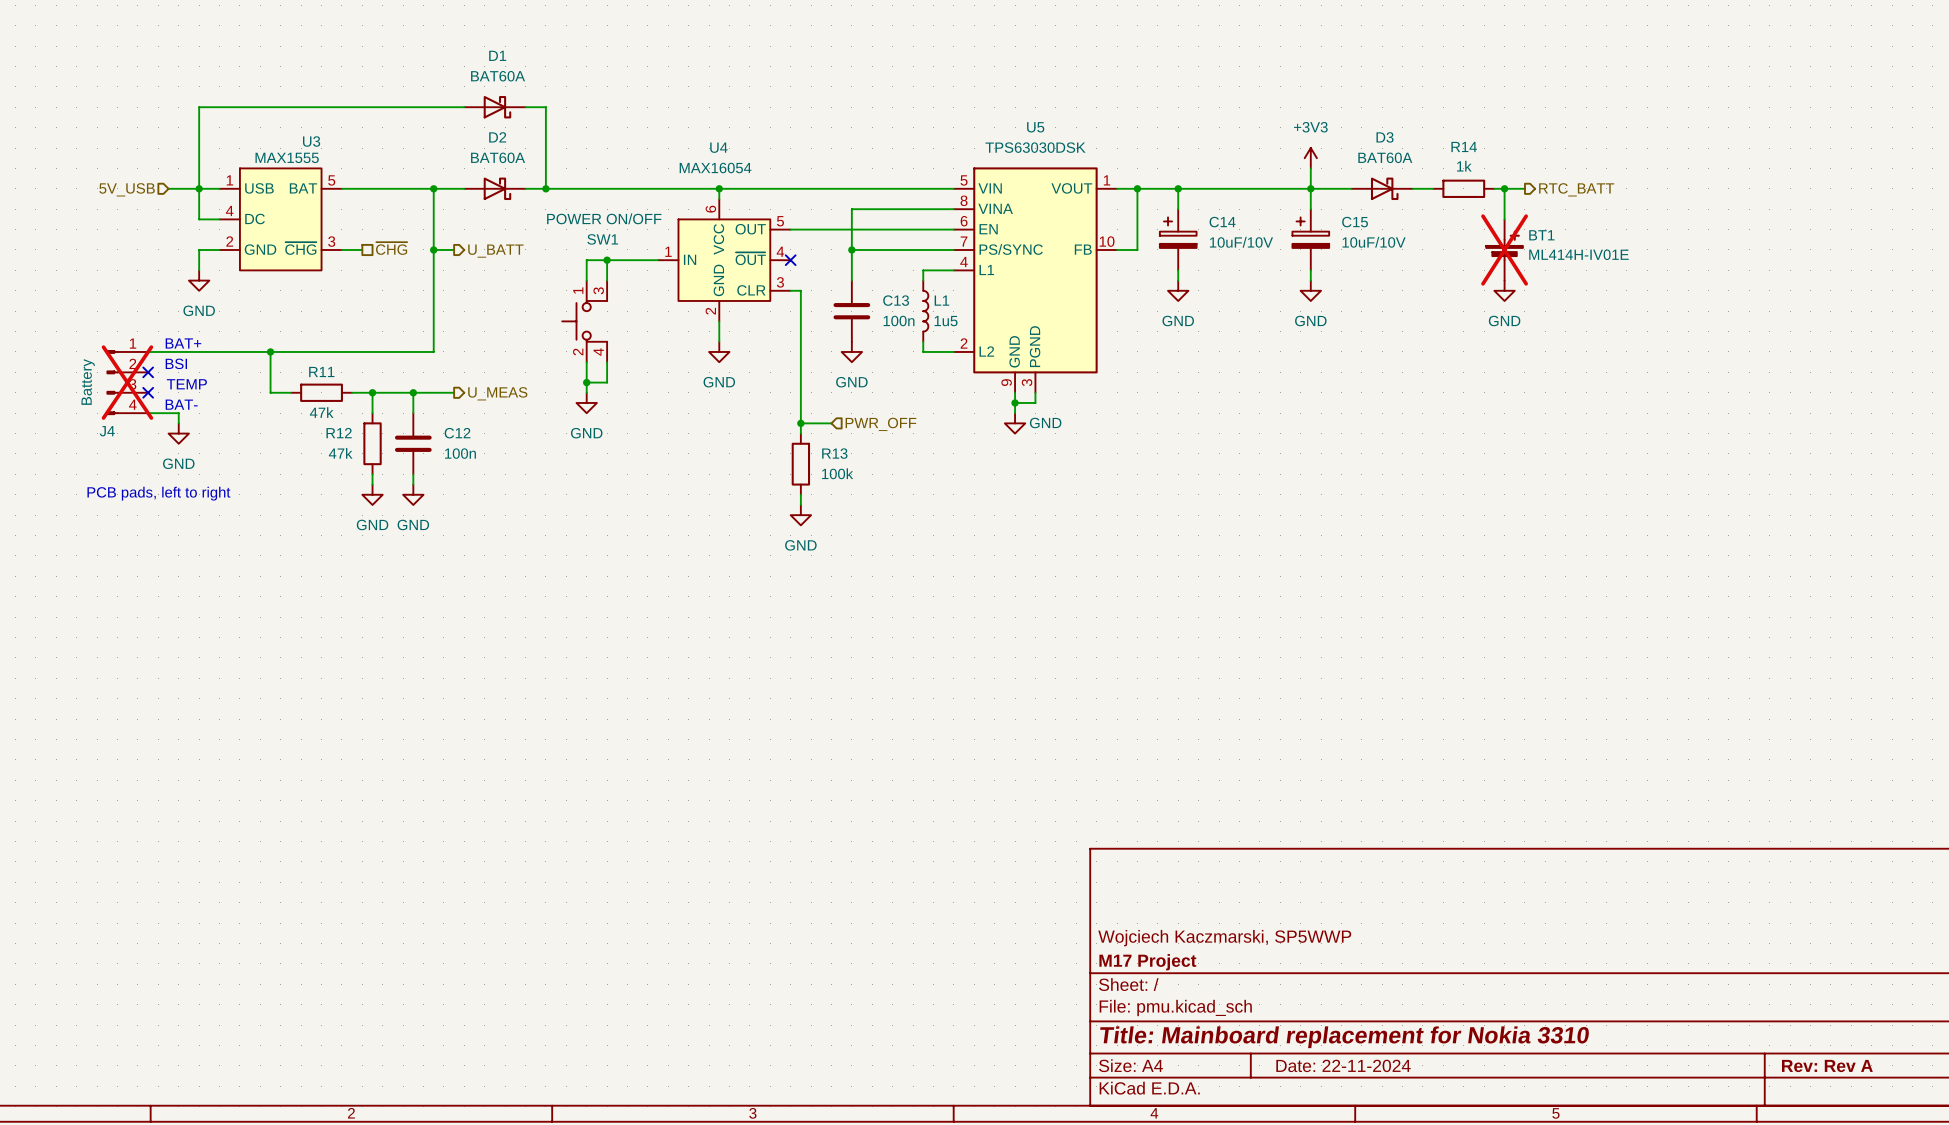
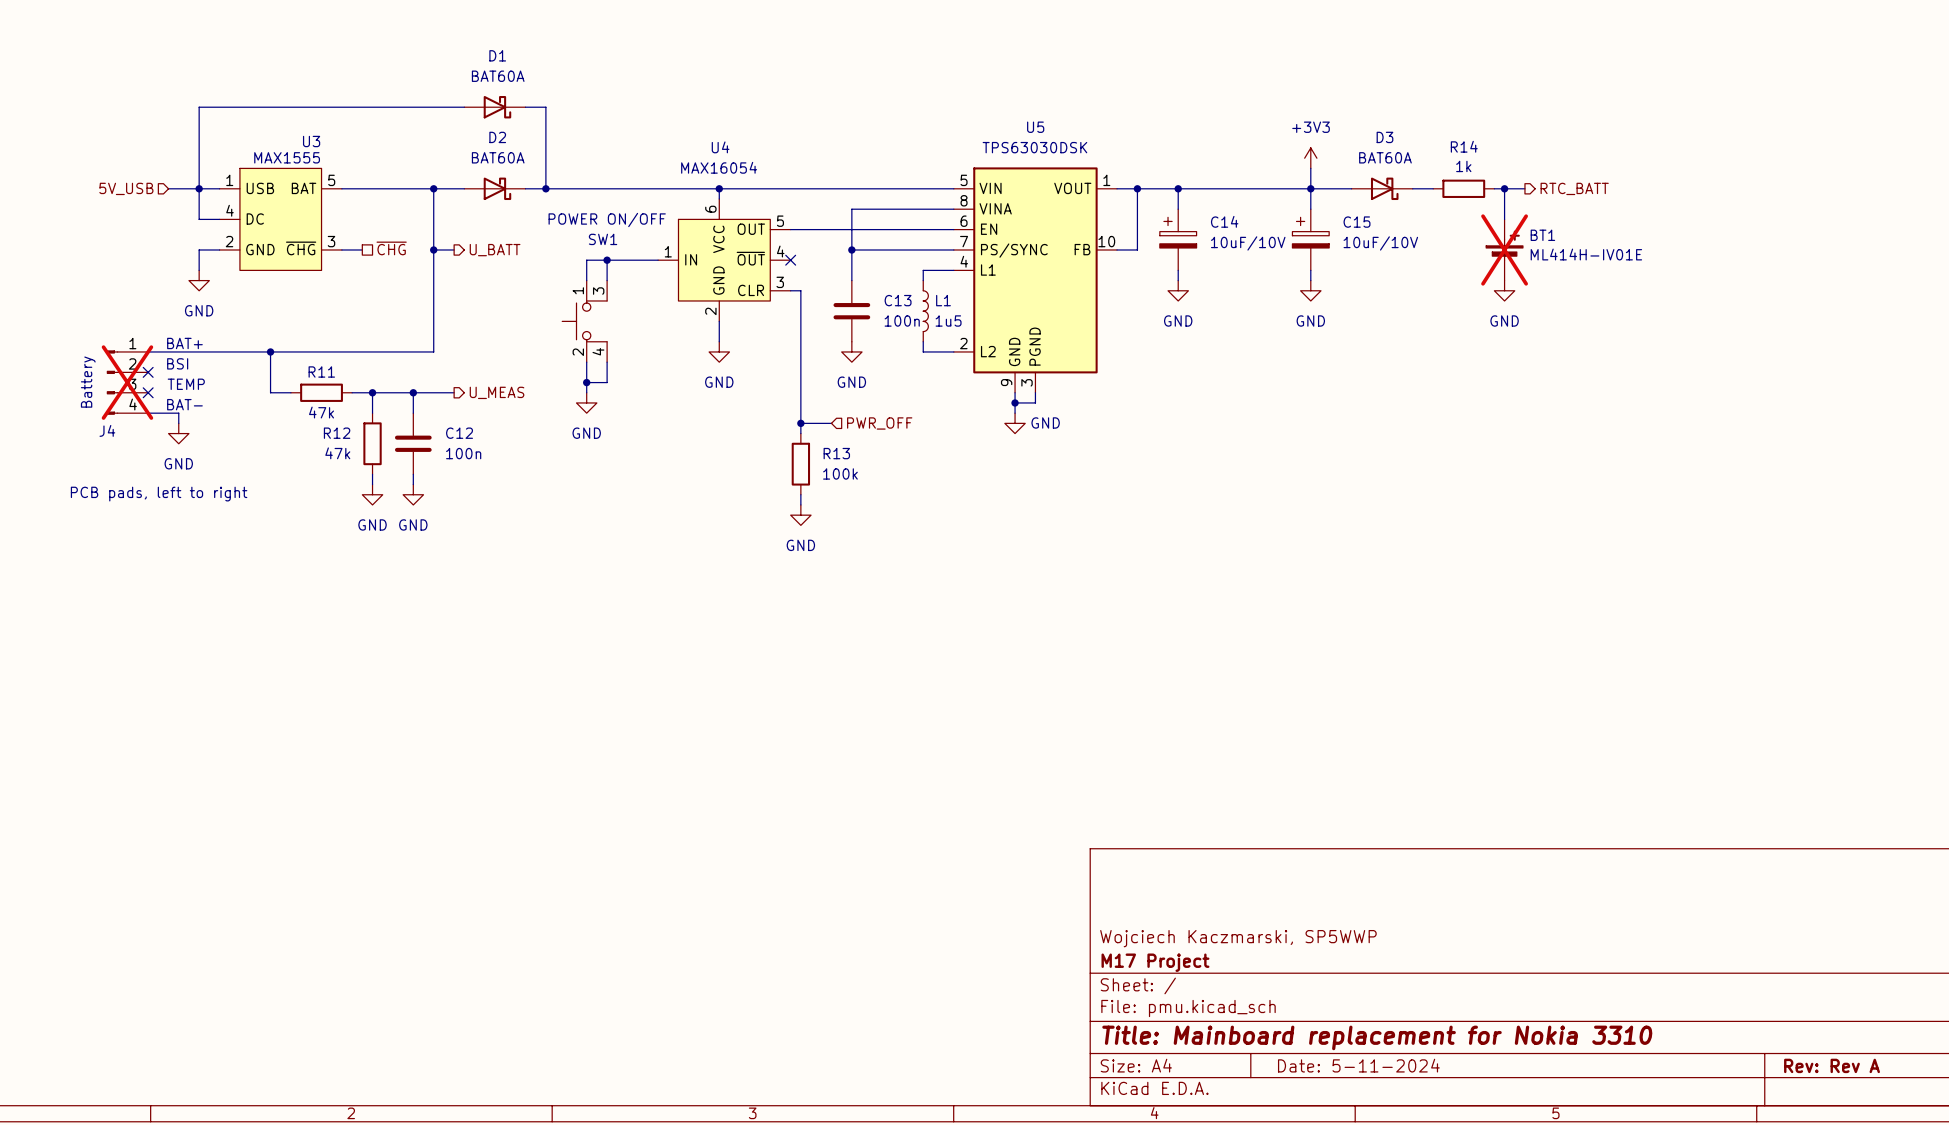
title block: Date: 22-11-2024 (1343, 1065) -> Date: 5-11-2024 (1358, 1065)

